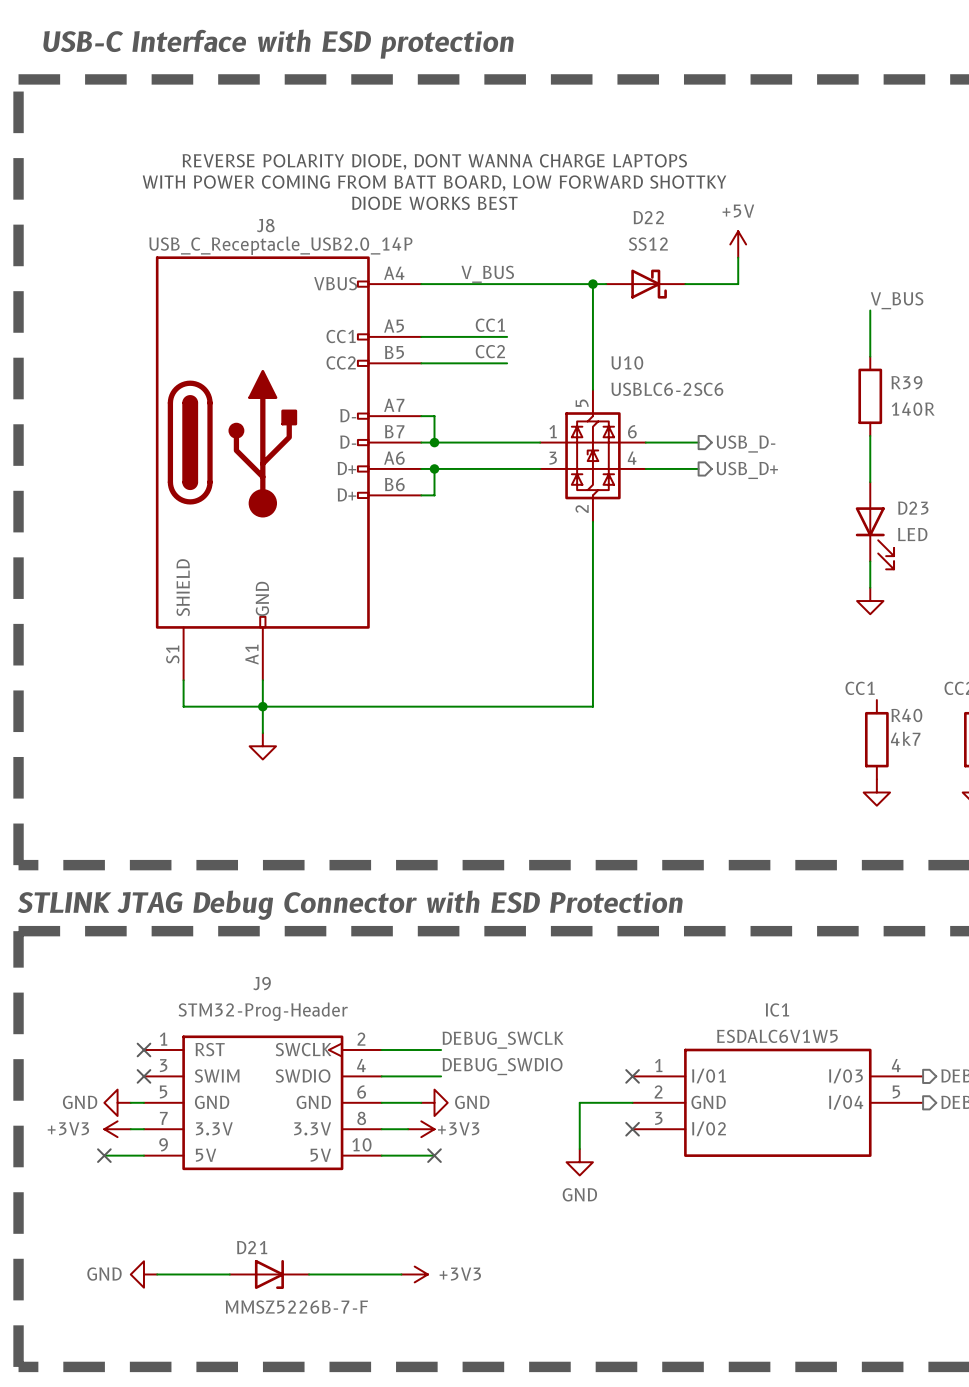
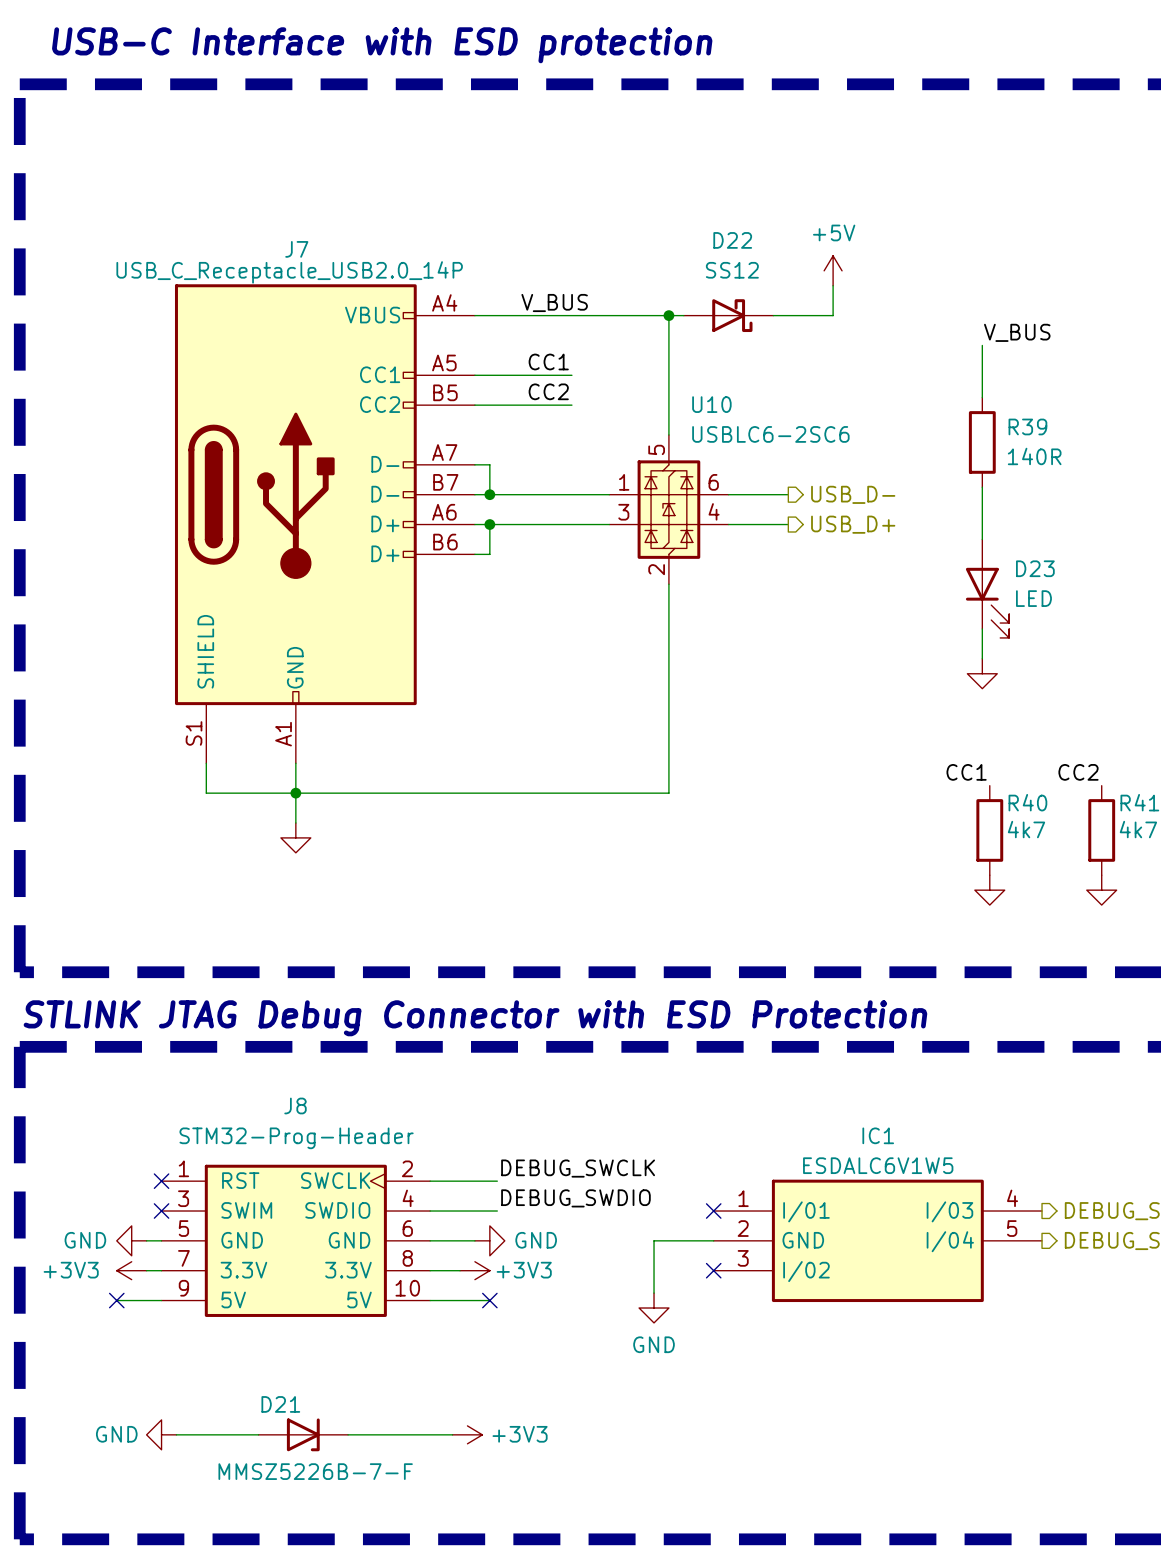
text: REVERSE POLARITY DIODE, DONT WANNA CHARGE LAPTOPS (434, 162) -> none
text: WITH POWER COMING FROM BATT BOARD, LOW FORWARD SHOTTKY (434, 183) -> none
text: DIODE WORKS BEST (434, 203) -> none
J8 name: J8 (265, 225) -> J7 (296, 249)
J9 name: J9 (262, 983) -> J8 (295, 1105)

